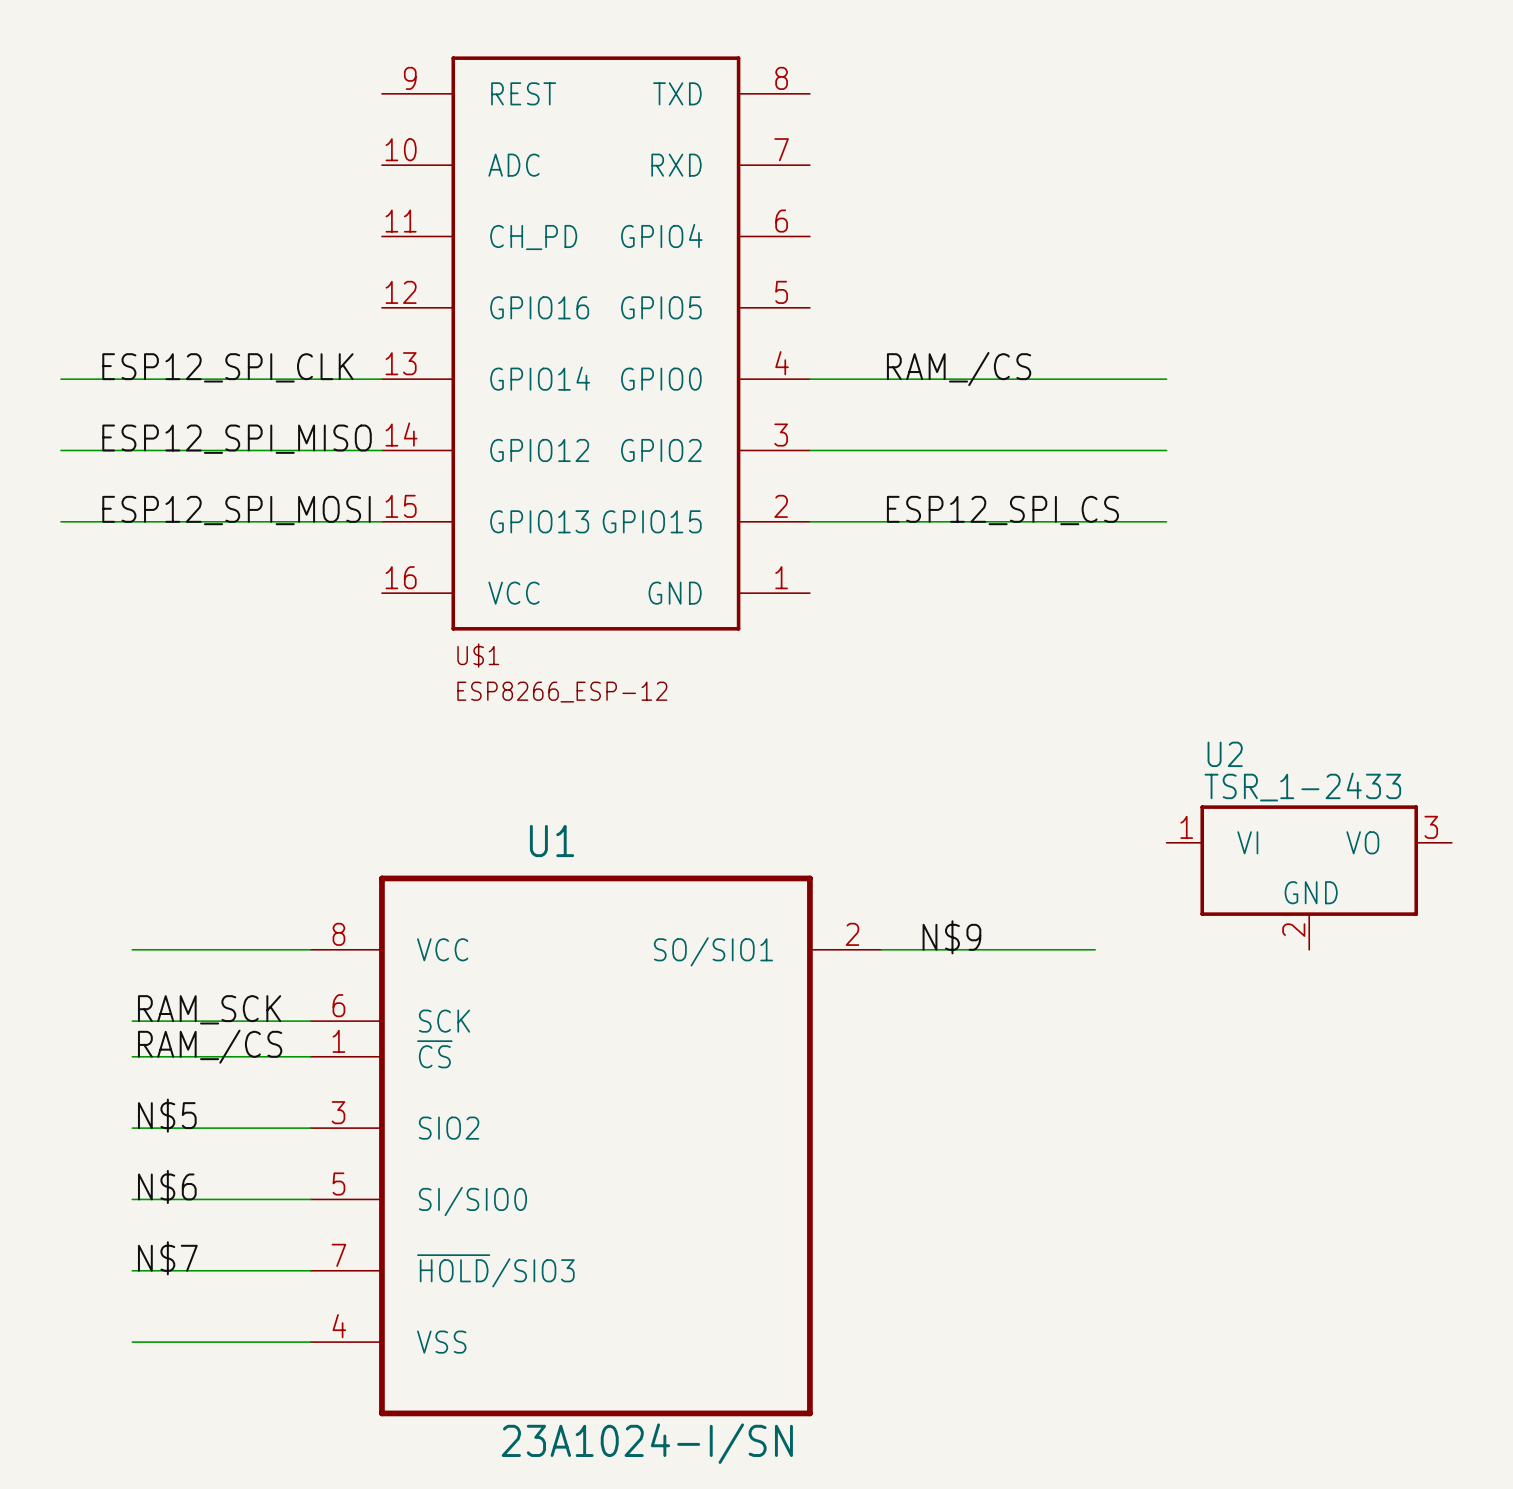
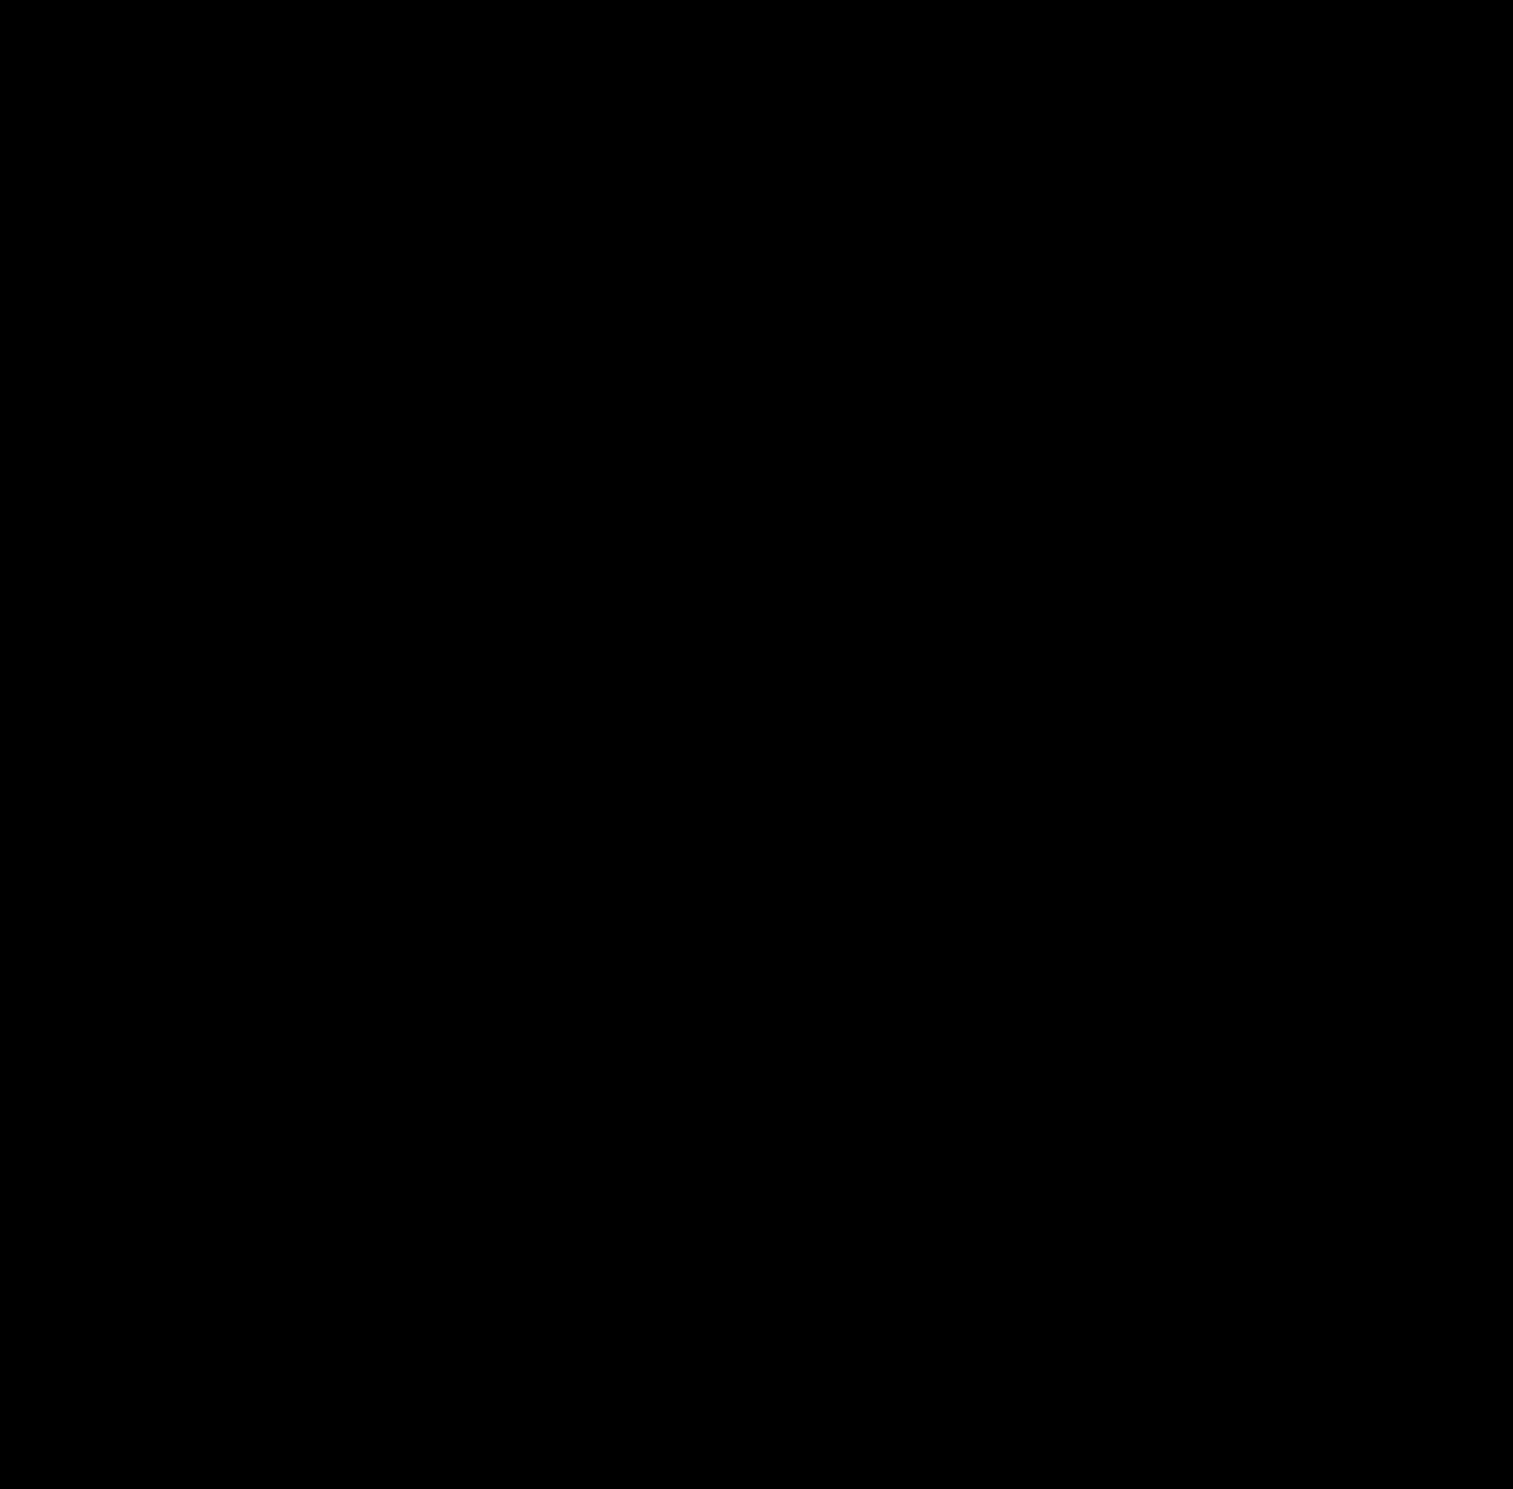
U$1: (595, 343) -> none
label: ESP12_SPI_CLK (227, 367) -> none
label: RAM_/CS (959, 369) -> none
wire: (60, 379) (381, 379) -> none
wire: (809, 379) (1166, 379) -> none
label: ESP12_SPI_MISO (237, 439) -> none
wire: (60, 450) (381, 450) -> none
wire: (809, 450) (1166, 450) -> none
label: ESP12_SPI_MOSI (236, 510) -> none
label: ESP12_SPI_CS (1002, 510) -> none
wire: (60, 521) (381, 521) -> none
wire: (809, 521) (1166, 521) -> none
U2: TSR_1-2433 (1309, 877) -> none
label: N$9 (951, 937) -> none
wire: (132, 949) (310, 949) -> none
wire: (881, 949) (1095, 949) -> none
label: RAM_SCK (209, 1009) -> none
wire: (132, 1021) (310, 1021) -> none
label: RAM_/CS (210, 1046) -> none
wire: (132, 1056) (310, 1056) -> none
label: N$5 (167, 1115) -> none
wire: (132, 1128) (310, 1128) -> none
U1: 23A1024-I/SN (595, 1145) -> none
label: N$6 (167, 1186) -> none
wire: (132, 1199) (310, 1199) -> none
label: N$7 (167, 1258) -> none
wire: (132, 1270) (310, 1270) -> none
wire: (132, 1342) (310, 1342) -> none

